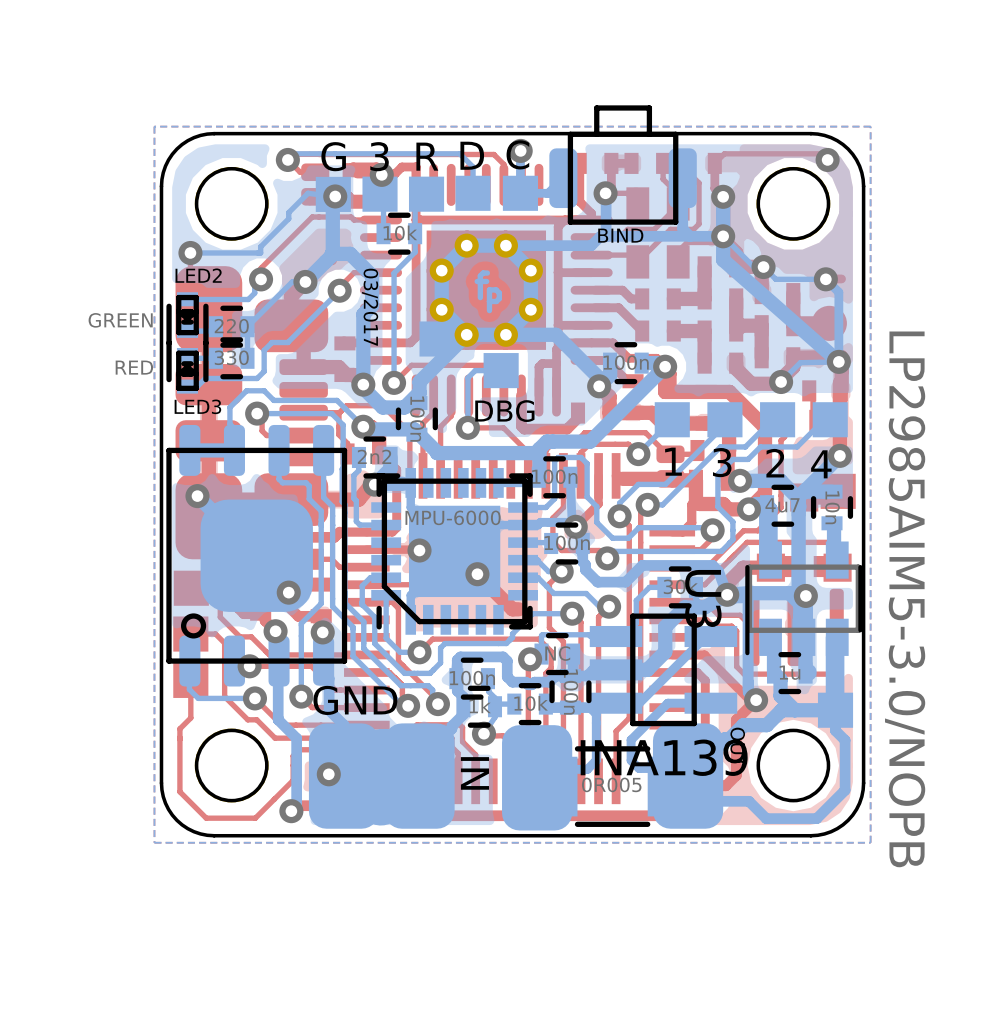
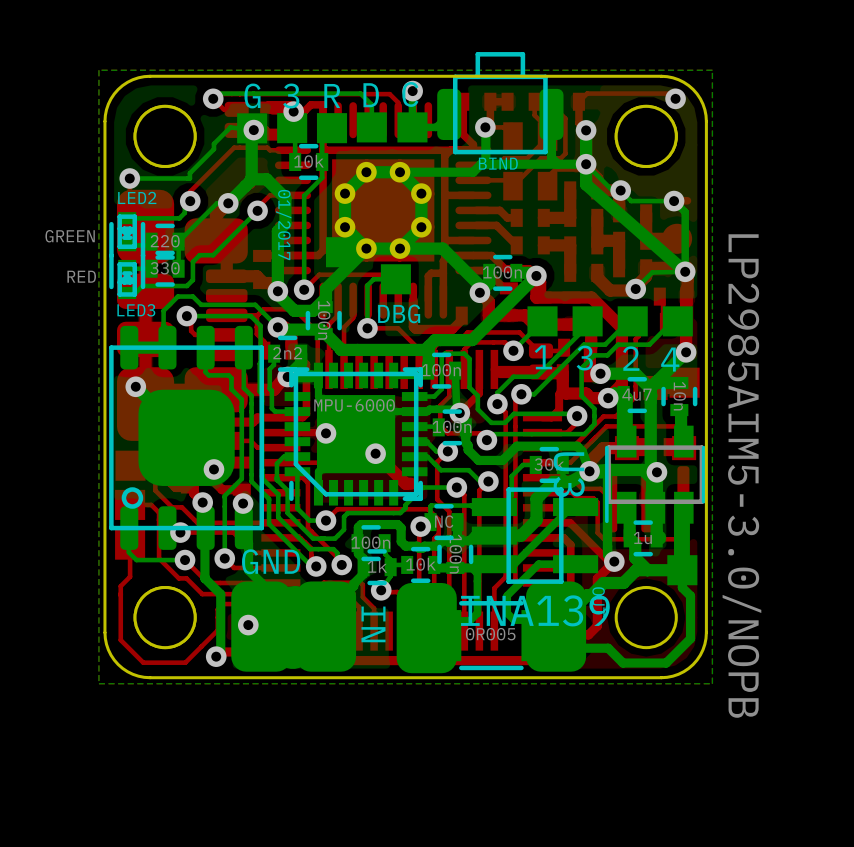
bottom track: (487, 273) (483, 273) (480, 275) (480, 297) -> none
bottom track: (486, 281) (477, 281) -> none
bottom track: (489, 301) (496, 301) (499, 298) (499, 293) (496, 289) (489, 289) (489, 310) -> none
text: 03/2017 (370, 307) -> 01/2017 (283, 225)

